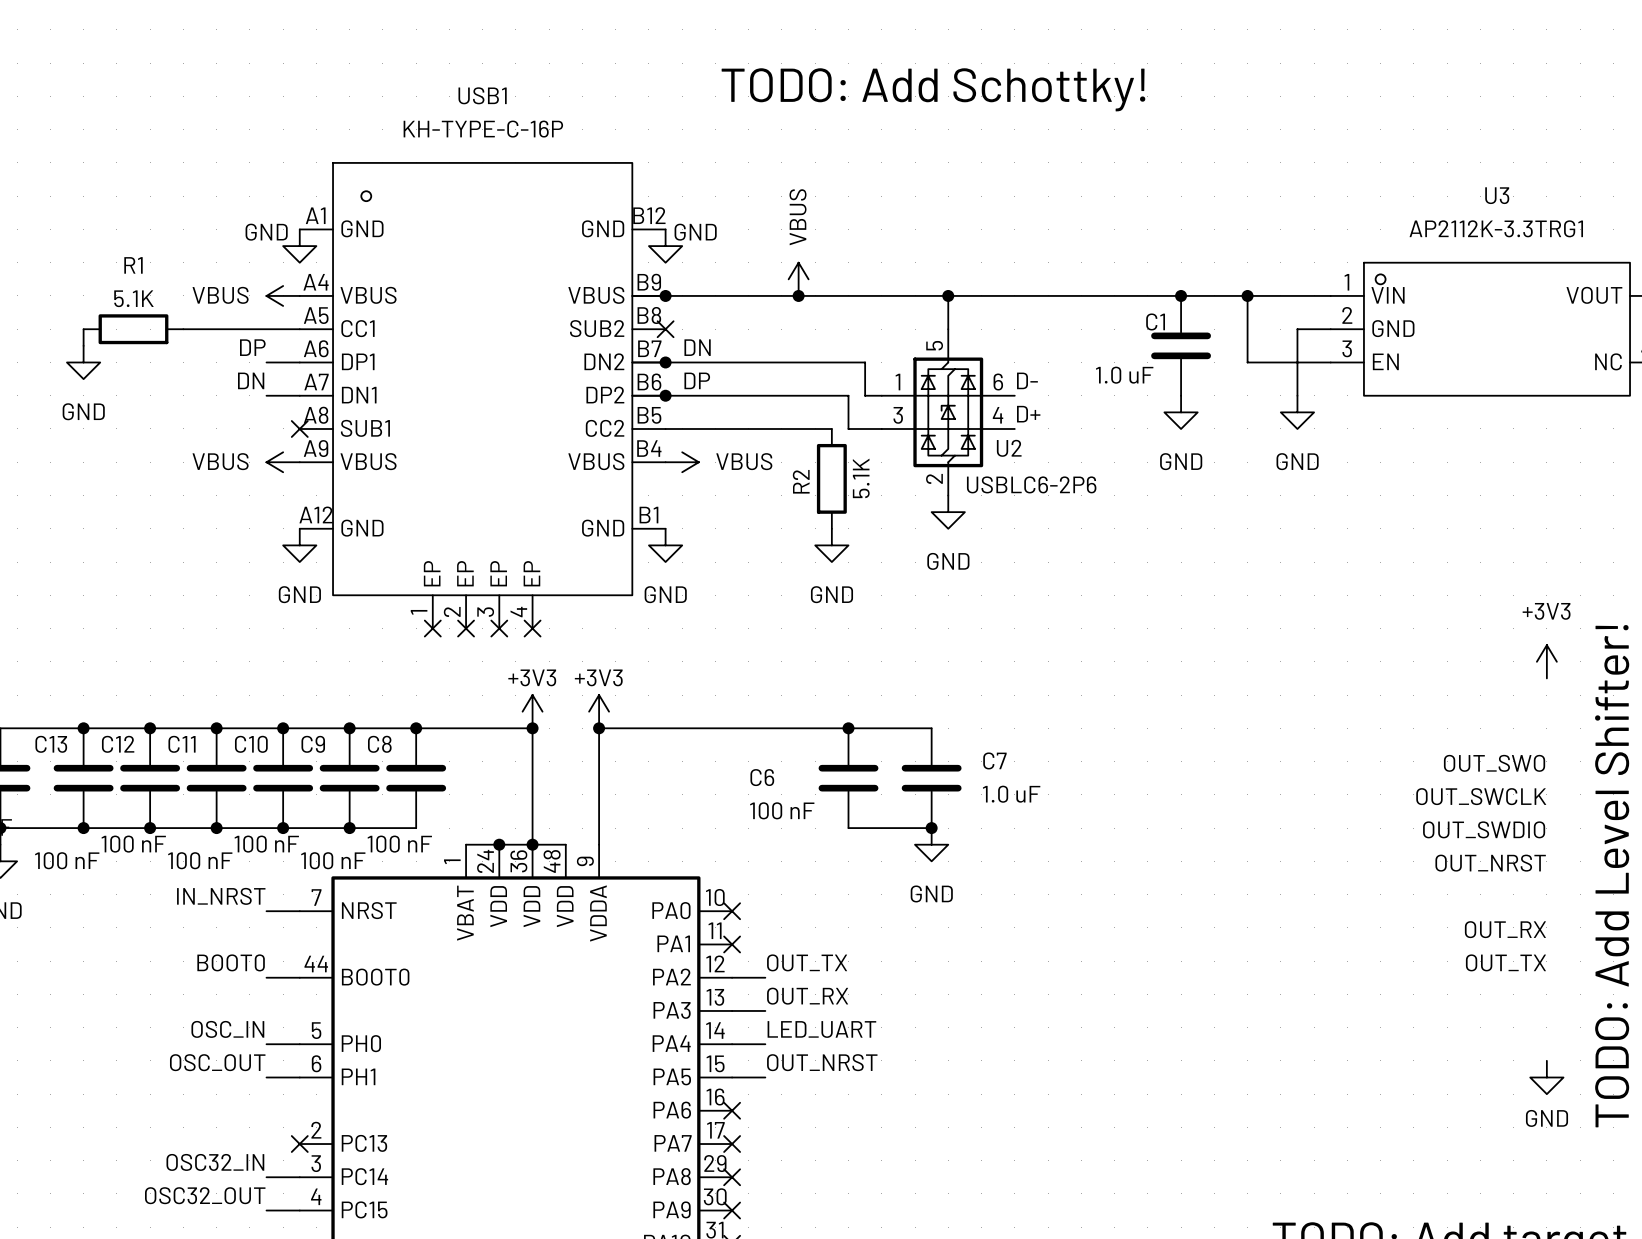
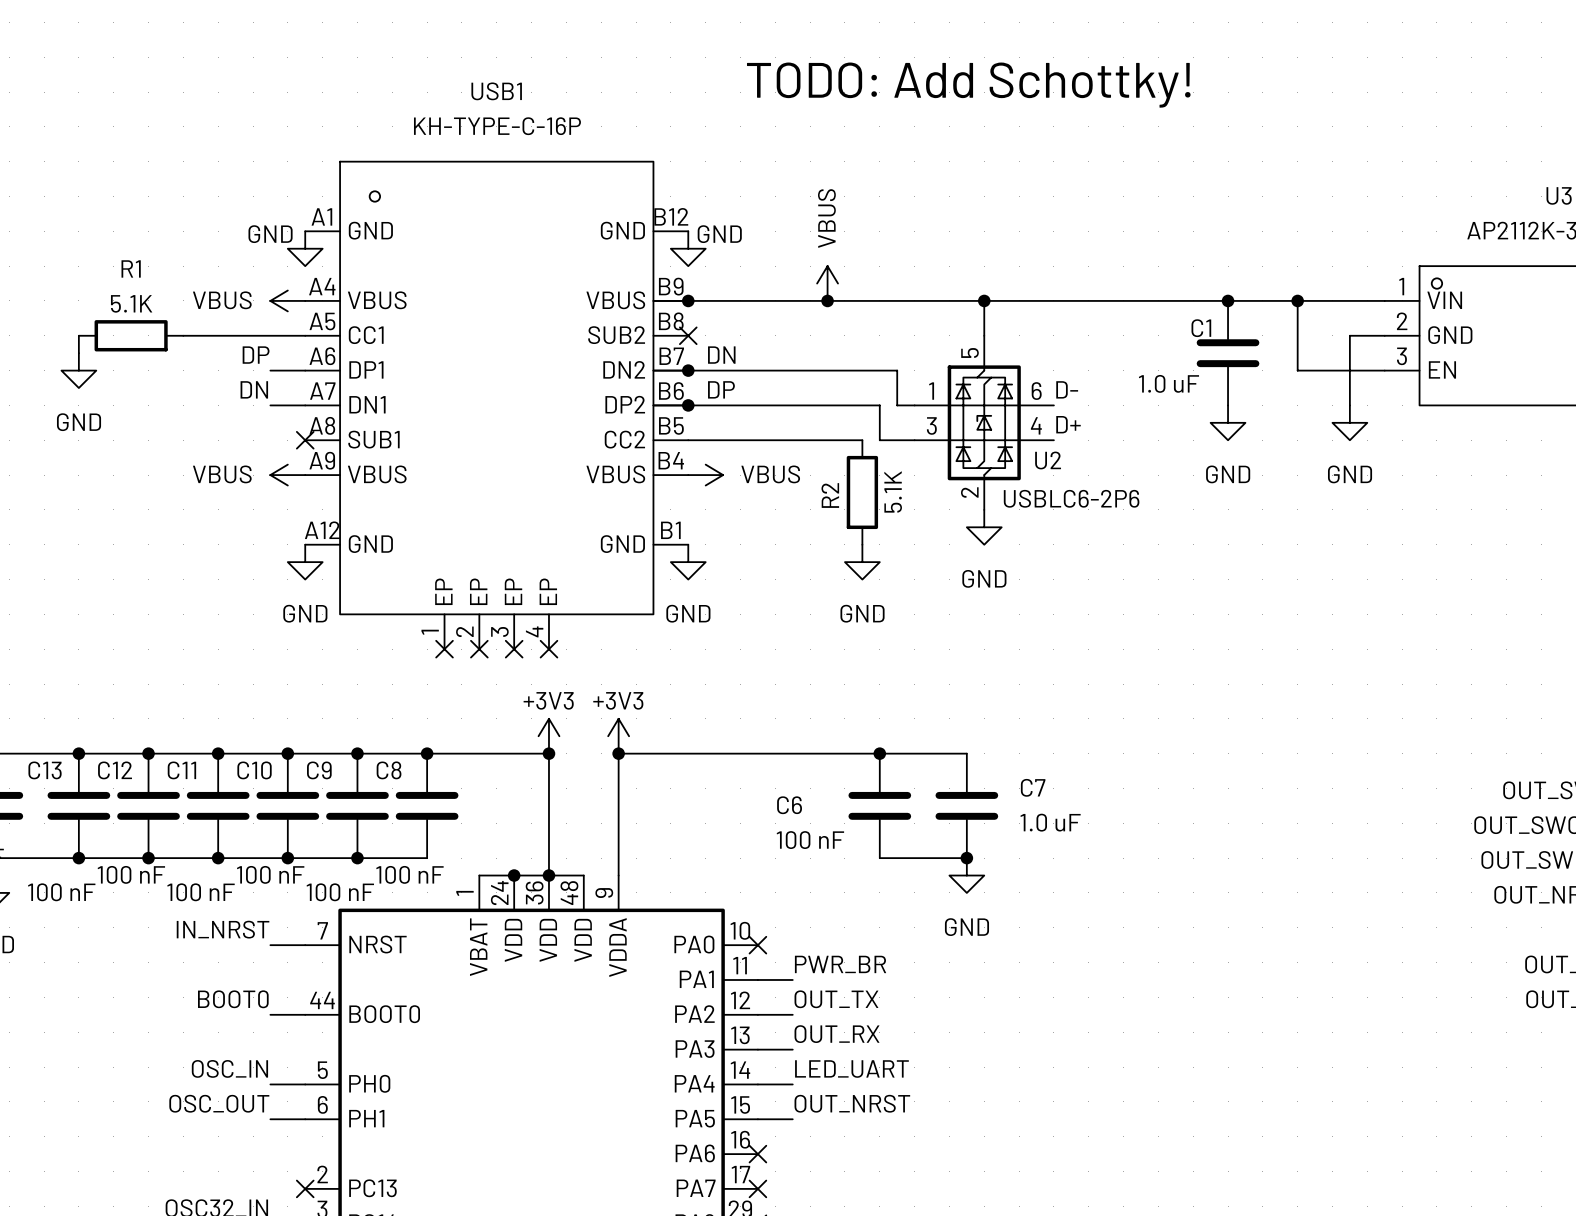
label: none -> PWR_BR (840, 964)
wire: none -> (757, 979) (792, 979)
no-connect mark: (732, 944) -> none

